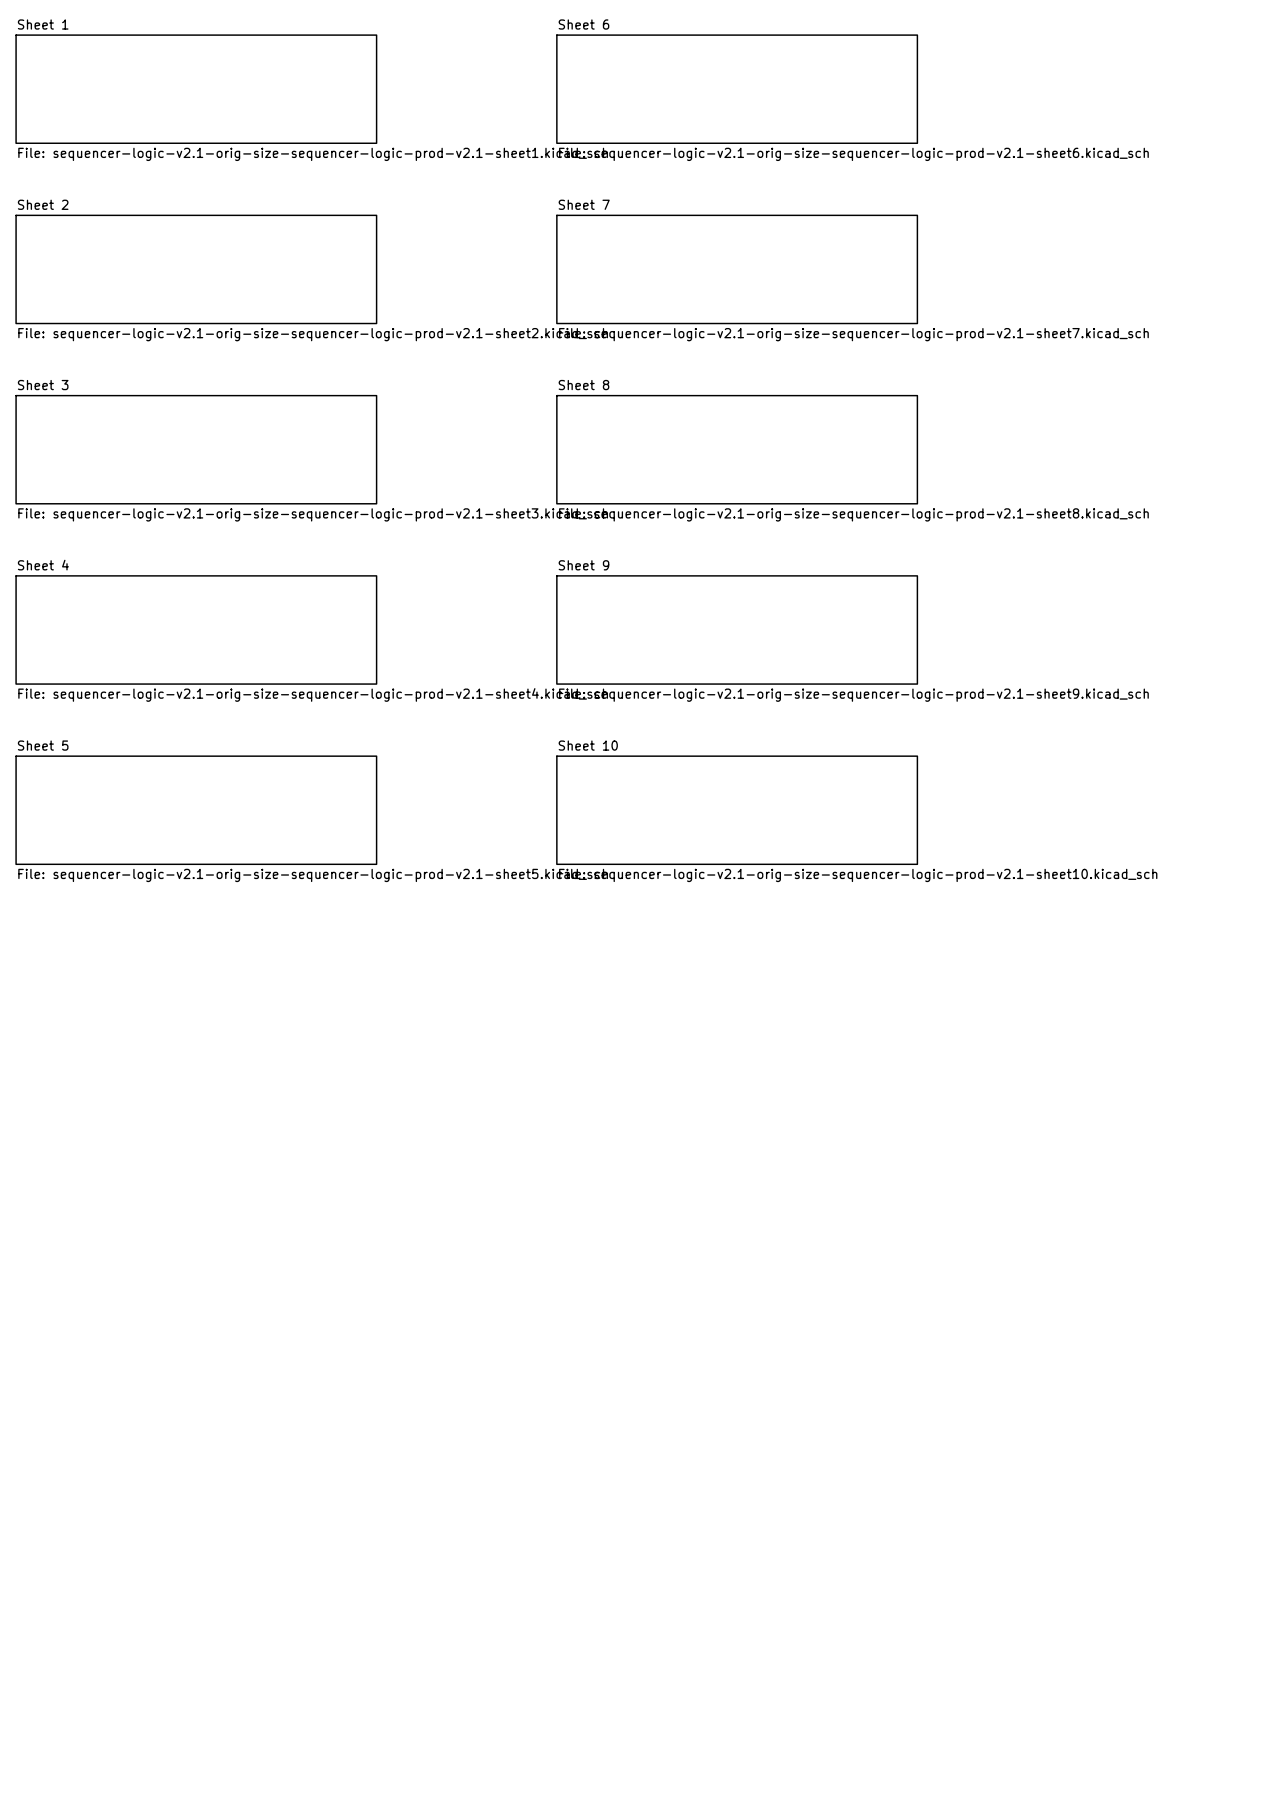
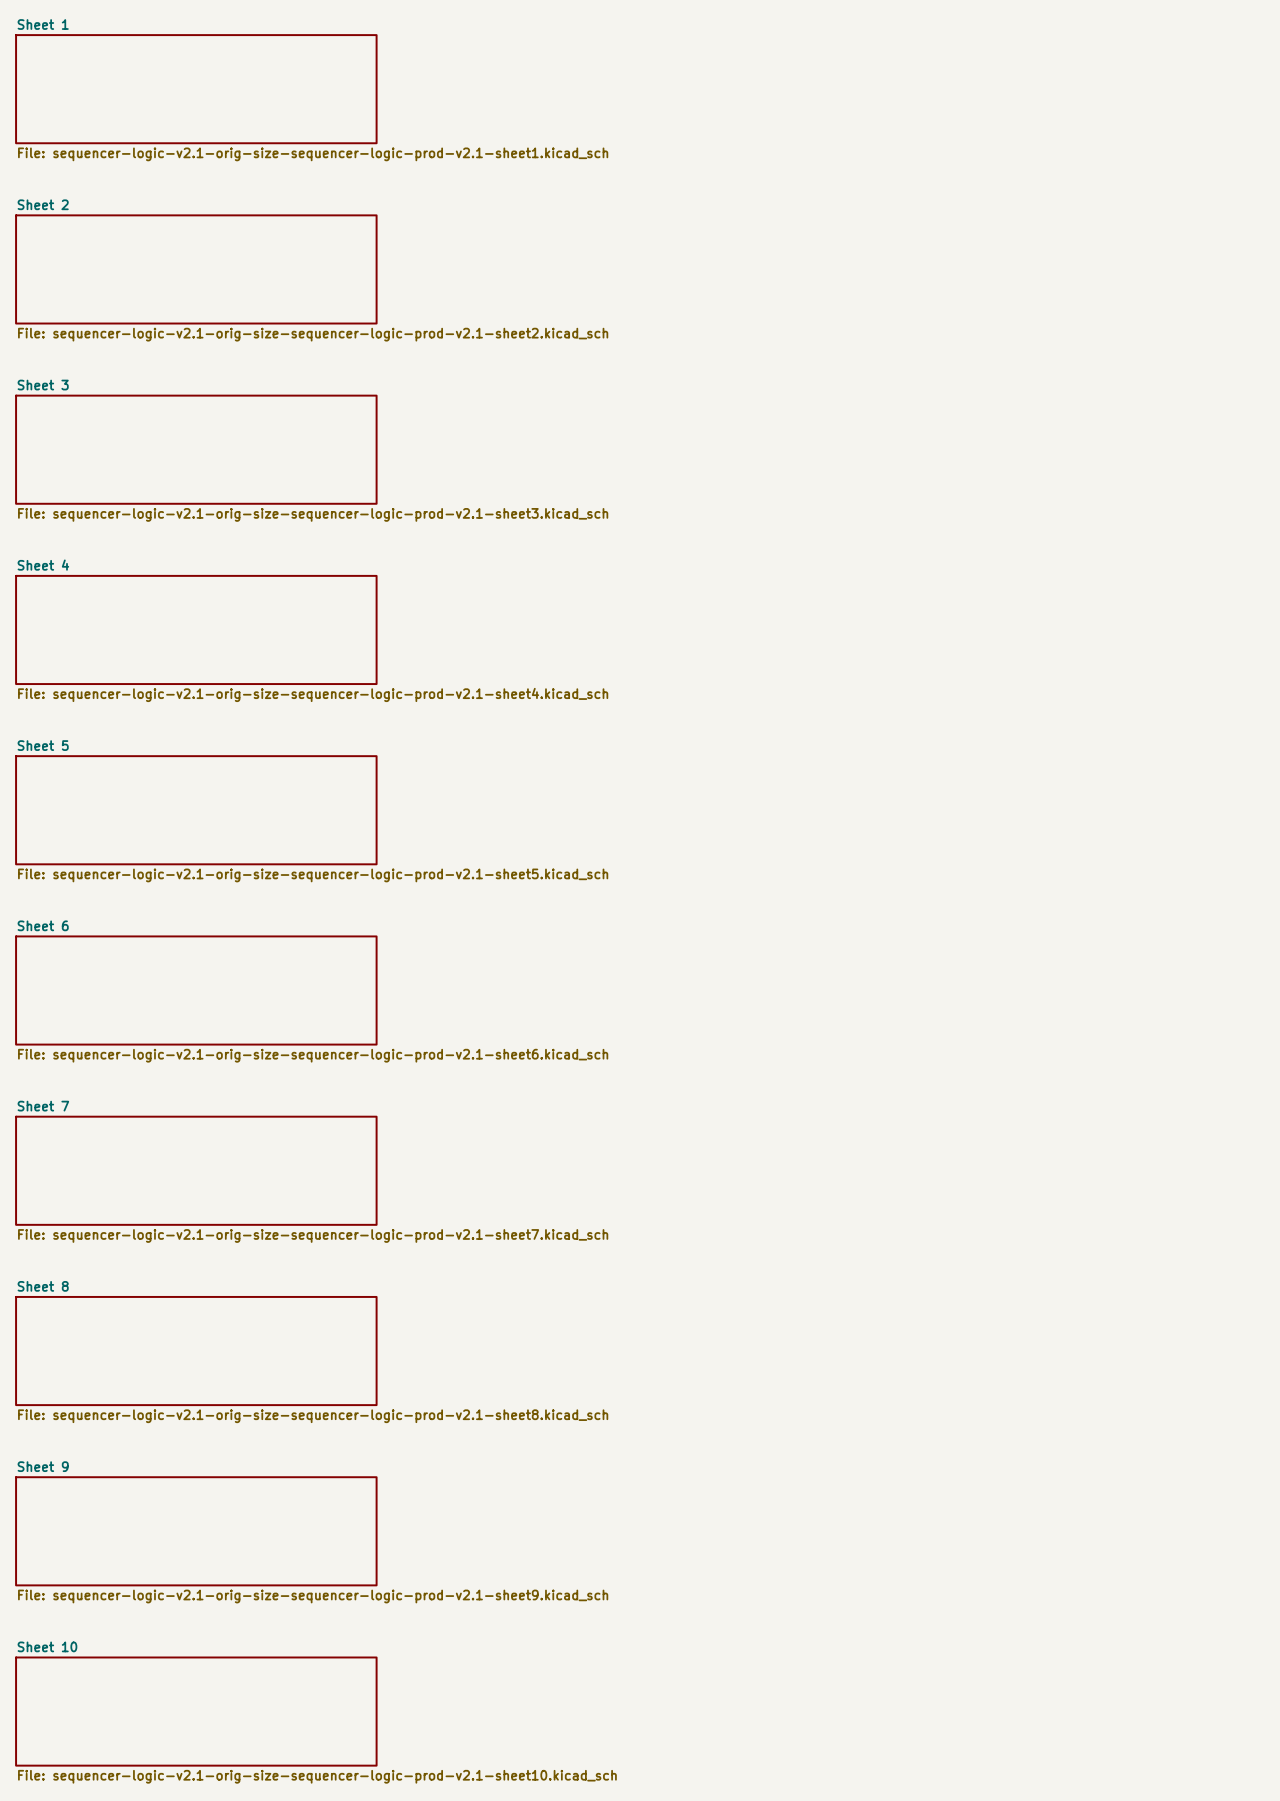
sheet Sheet 6 position: (737, 89) -> (196, 990)
sheet Sheet 7 position: (737, 269) -> (196, 1170)
sheet Sheet 8 position: (737, 449) -> (196, 1351)
sheet Sheet 9 position: (737, 629) -> (196, 1531)
sheet Sheet 10 position: (737, 810) -> (196, 1711)

